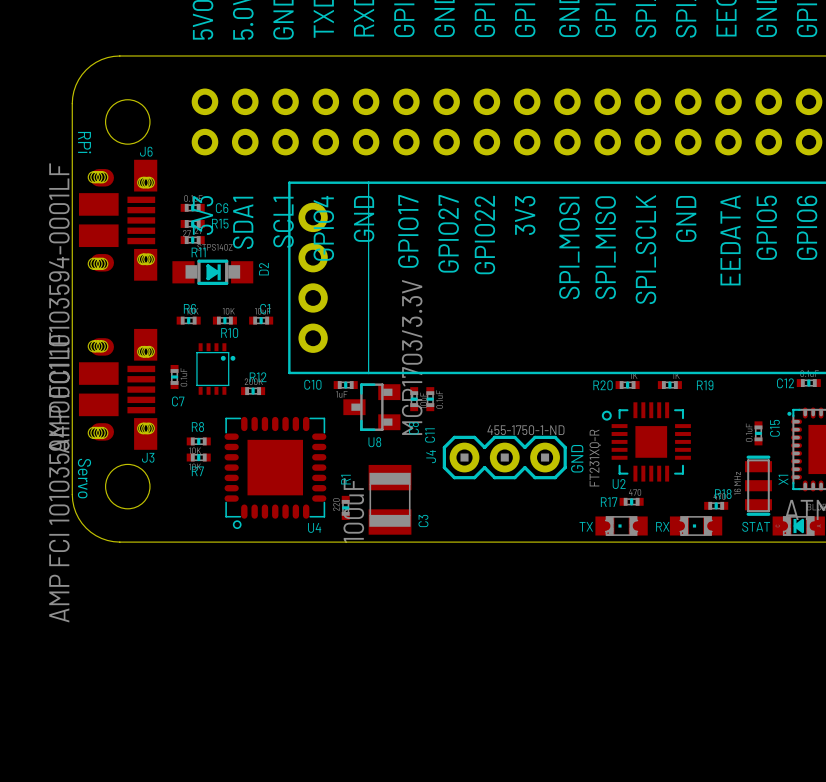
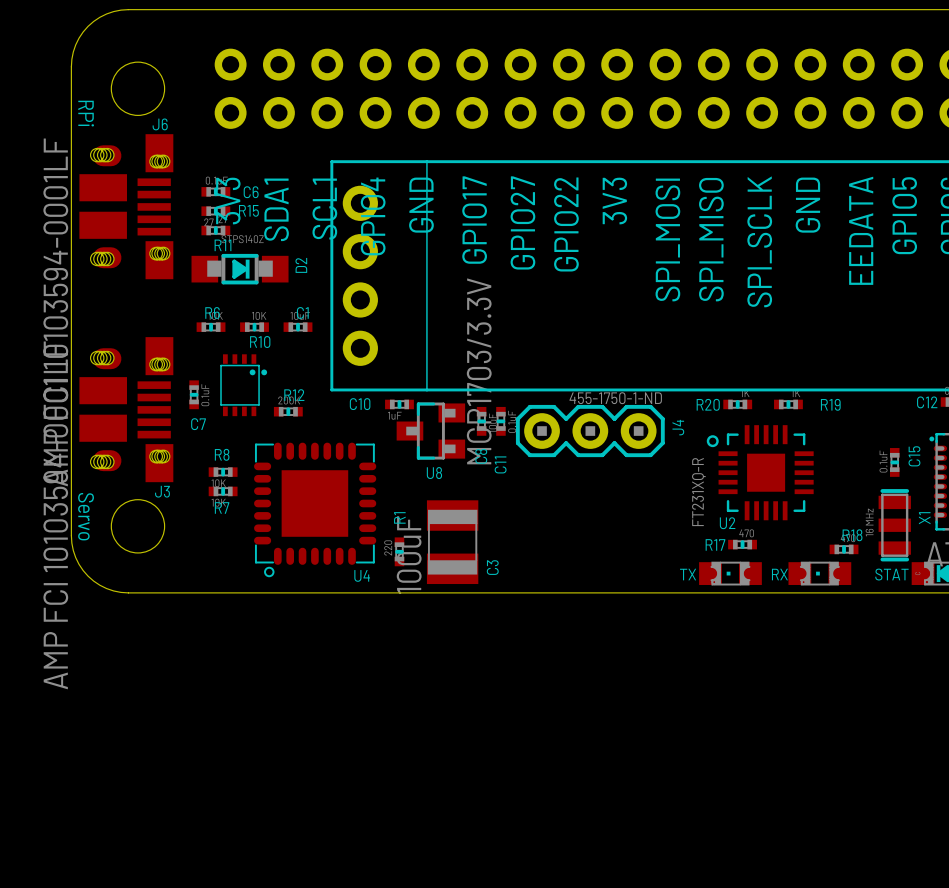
J4 name position: J4 (431, 456) -> J4 (678, 427)
J4 position: (504, 457) -> (590, 431)
text: GND (577, 458) -> none

